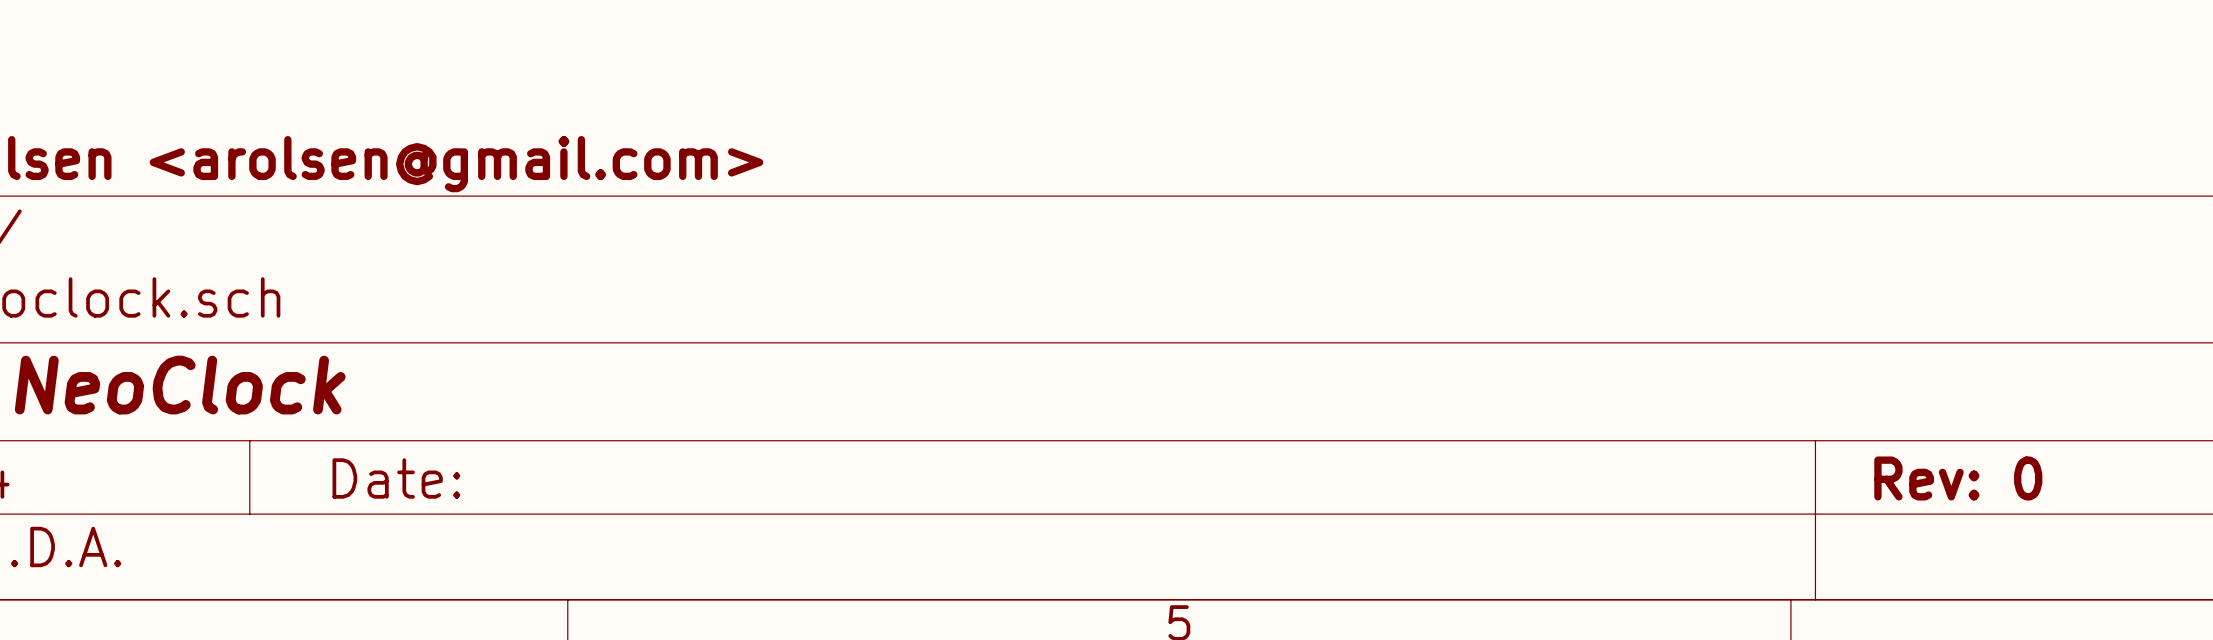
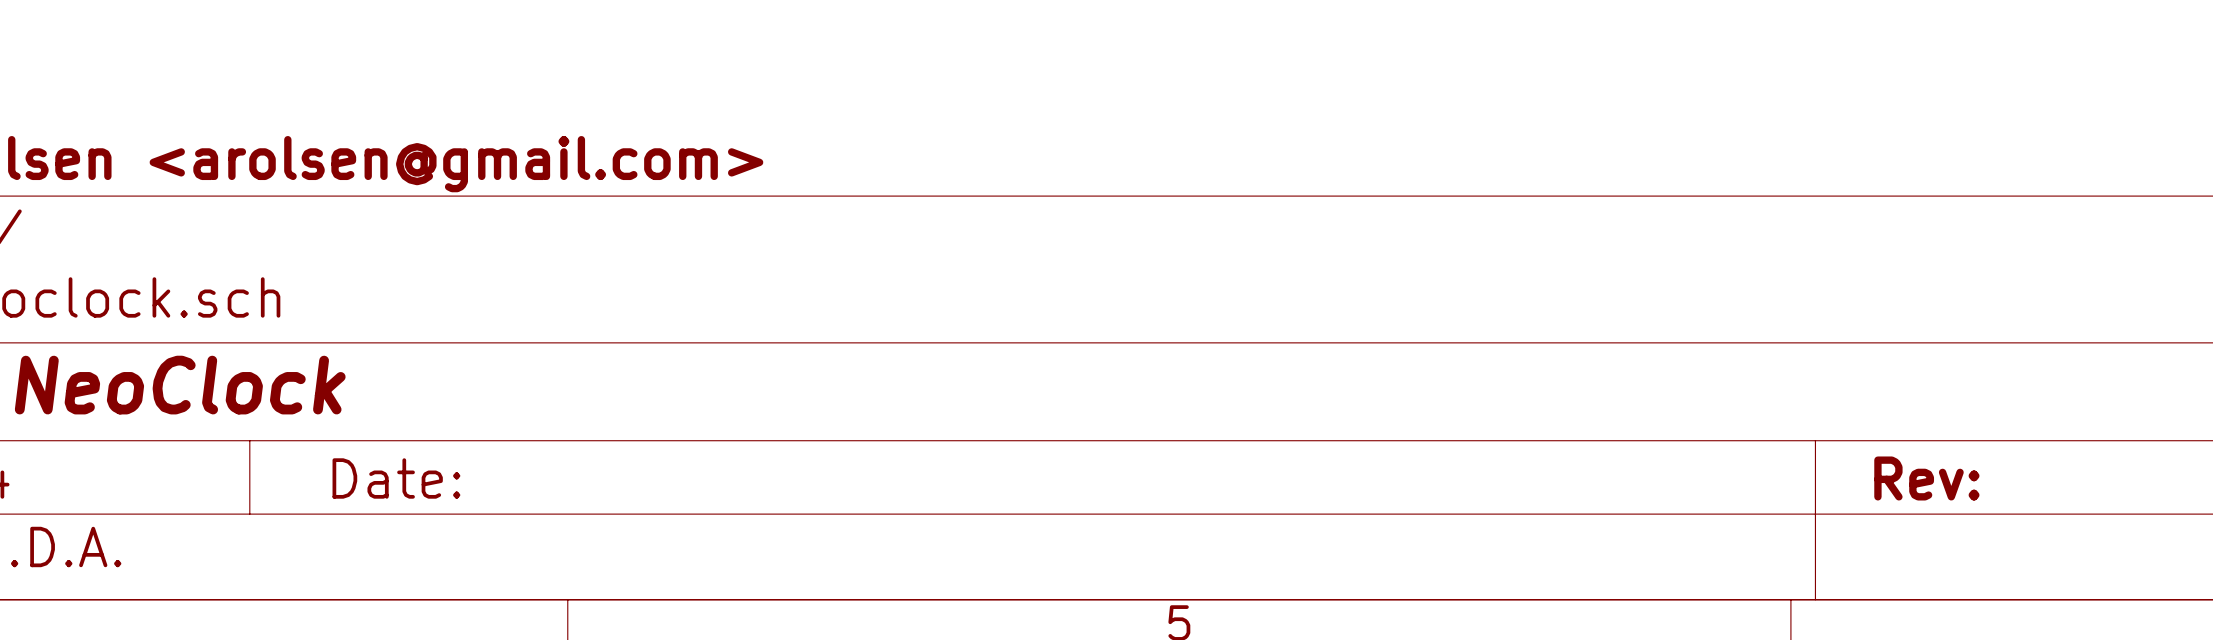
title block: Rev: 0 (1958, 478) -> Rev: (1926, 478)

